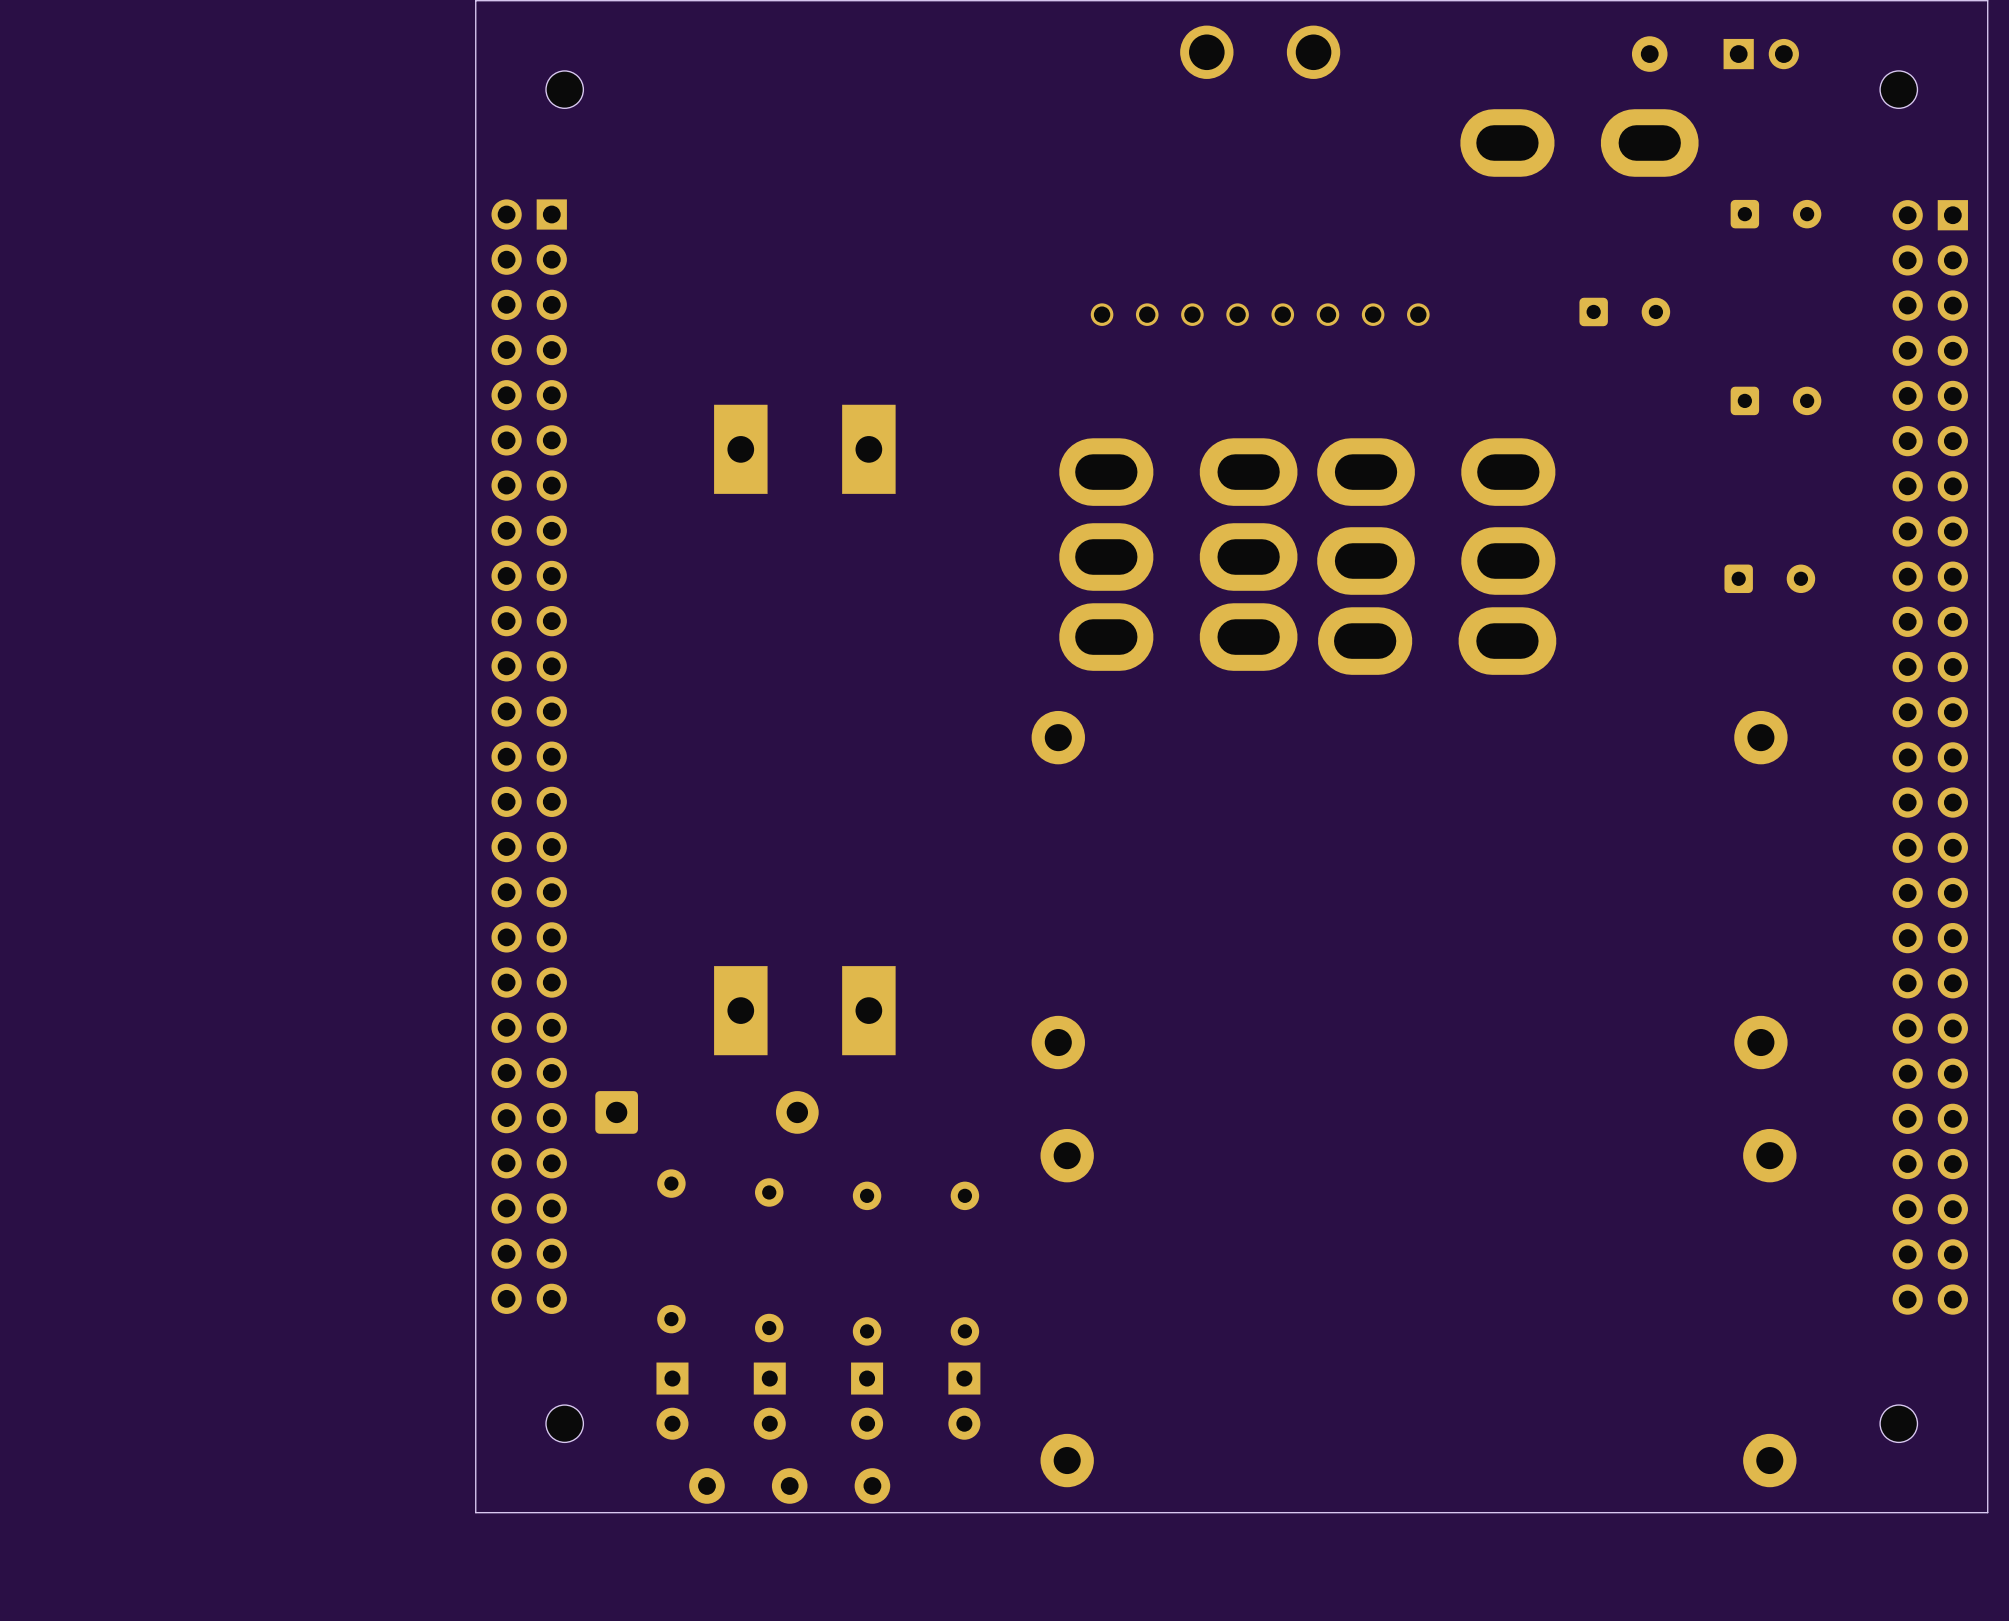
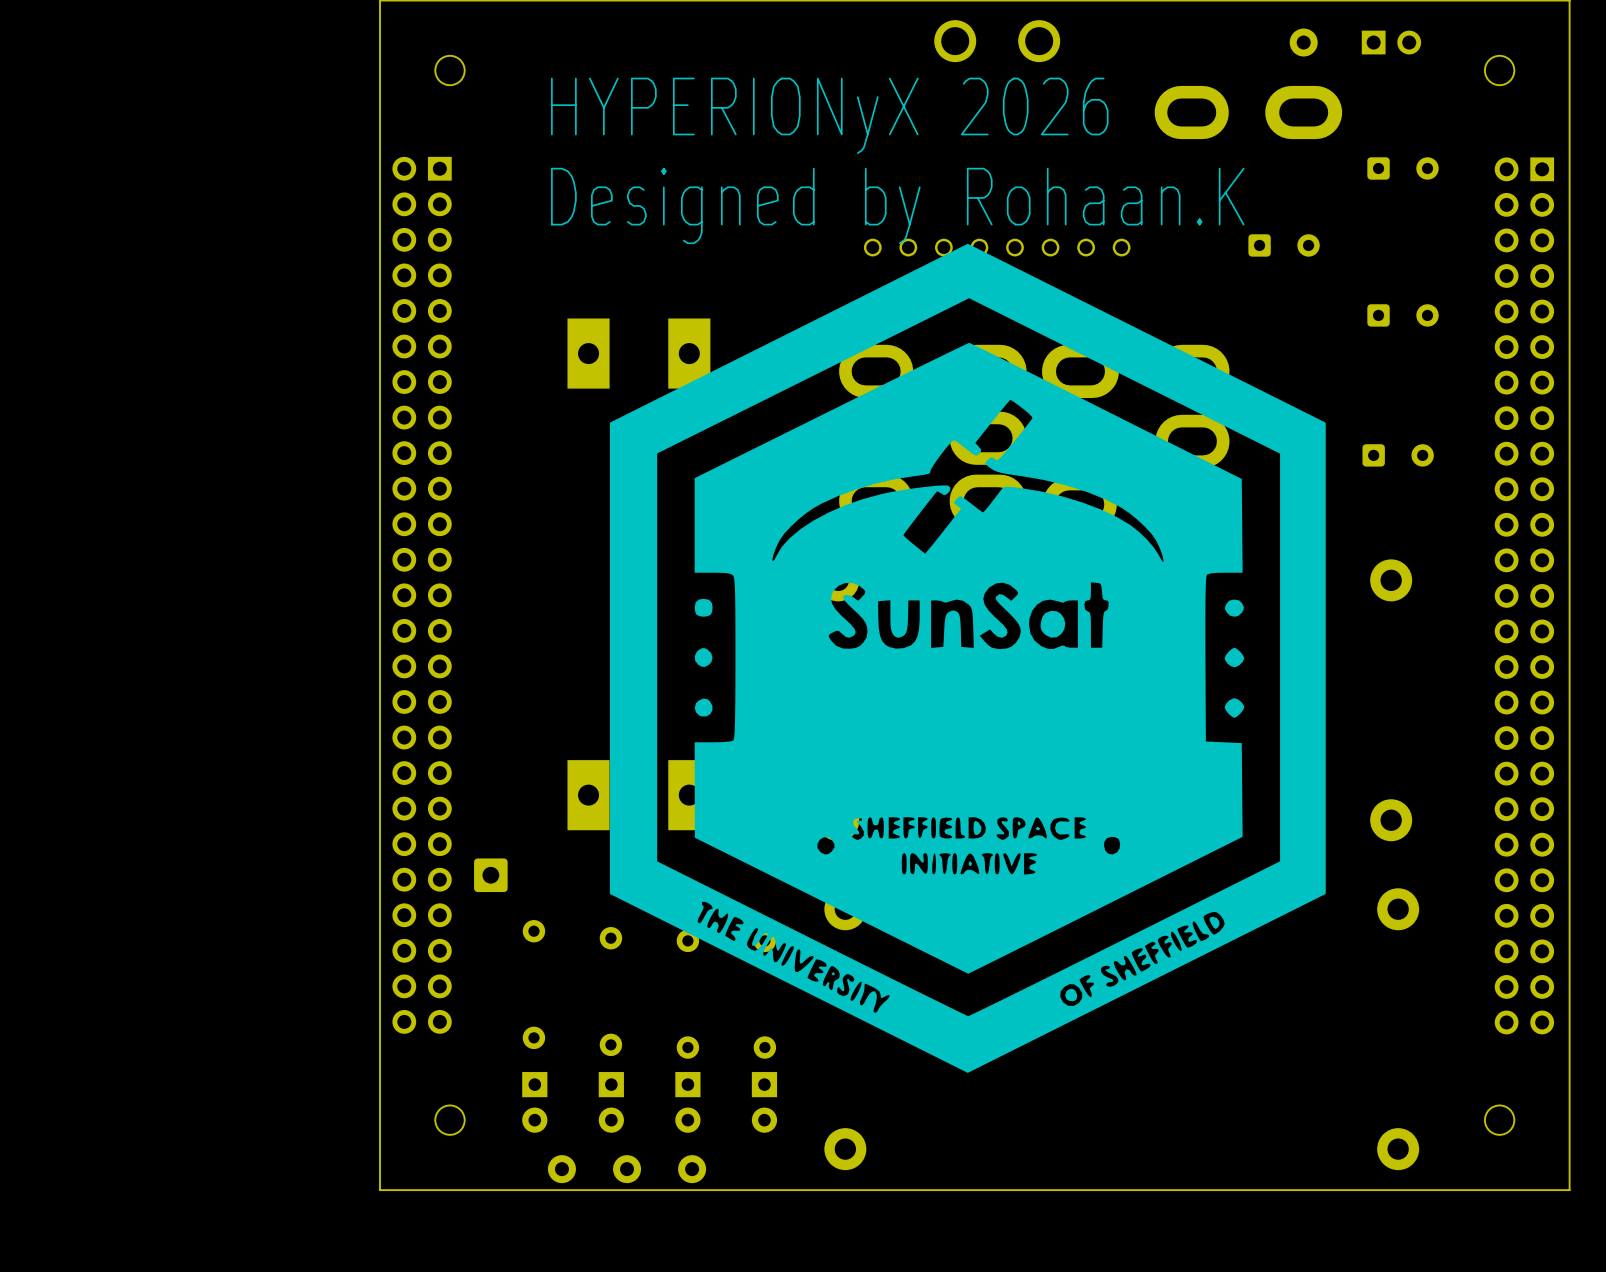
text: none -> HYPERIONyX 2026 (829, 115)
text: none -> Designed by Rohaan.K (897, 205)
drawing: none -> [609, 243, 1326, 1073]

